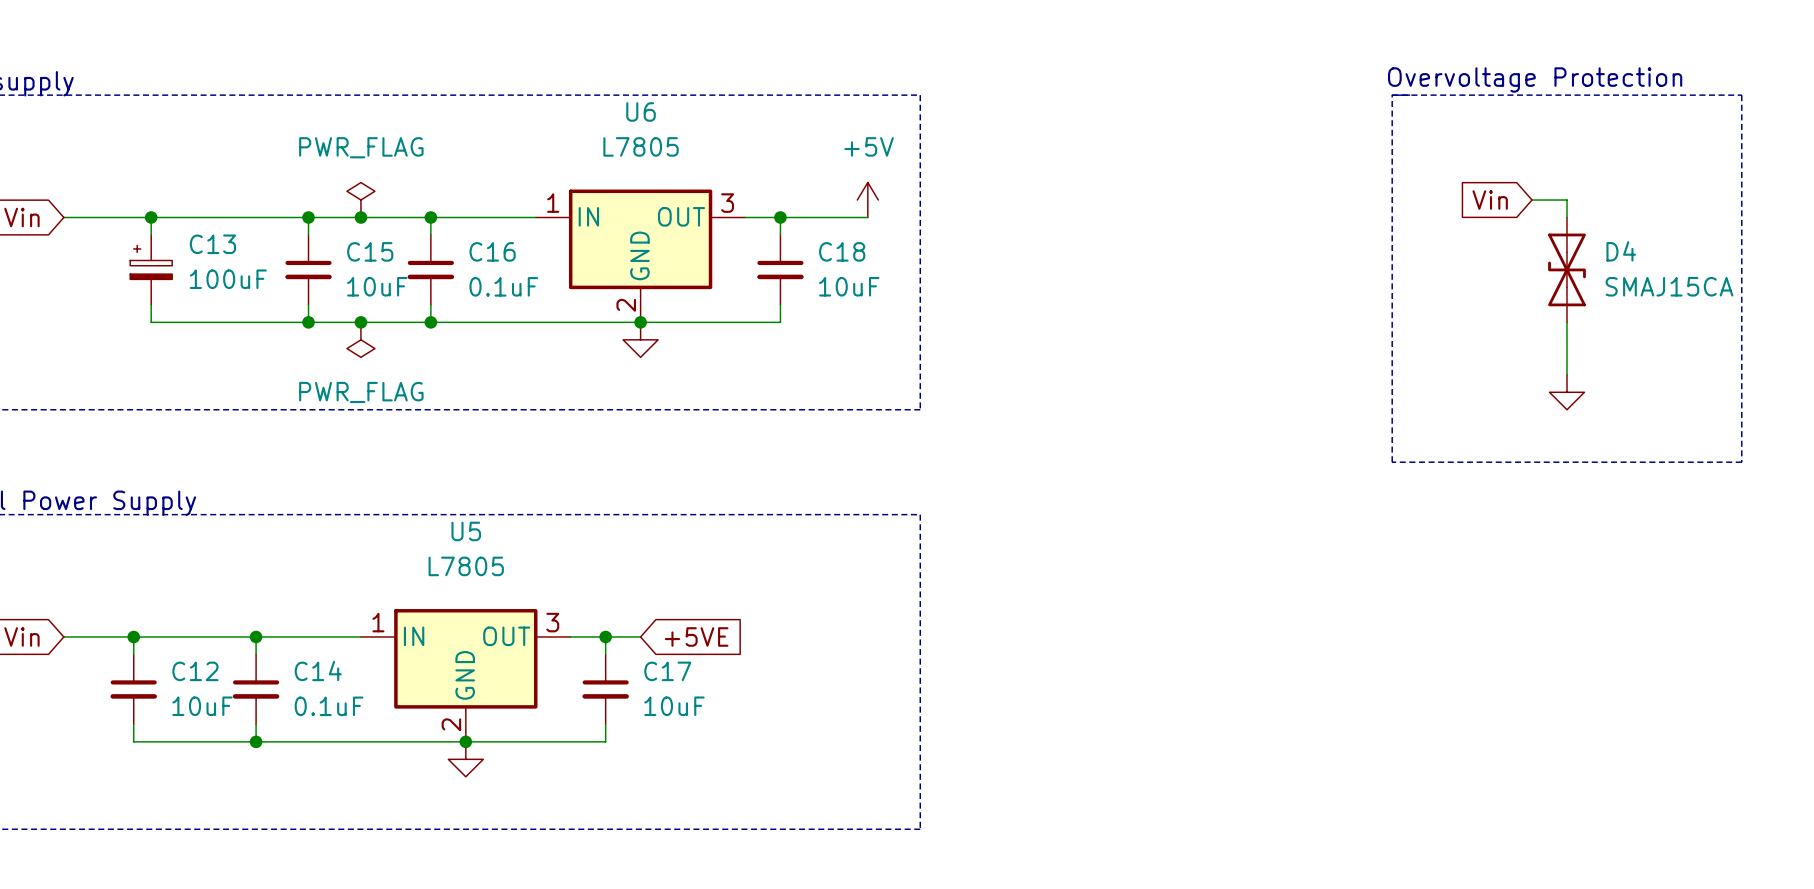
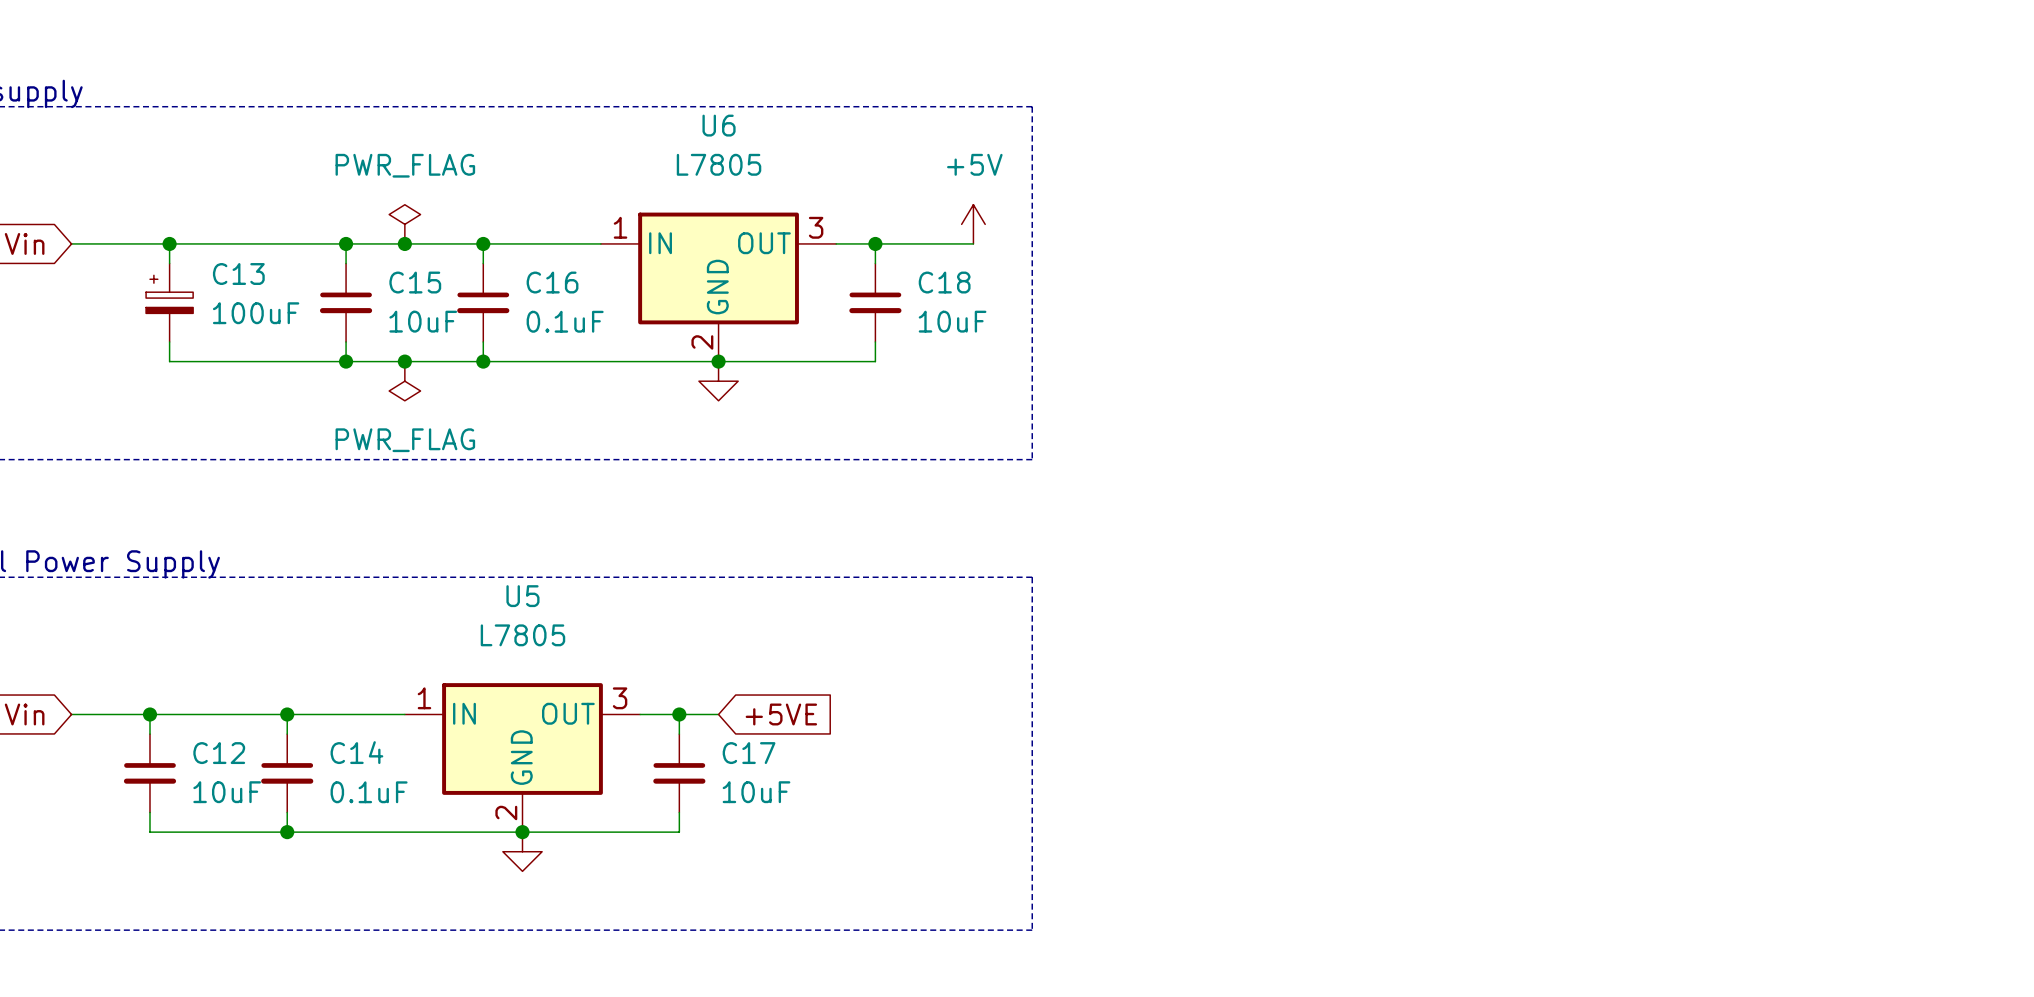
text: Overvoltage Protection (1535, 79) -> none
line: (1392, 95) (1741, 95) (1741, 462) (1392, 462) (1392, 95) -> none
line: (1392, 95) (1409, 95) -> none
global label: Vin (1490, 200) -> none
wire: (1532, 200) (1566, 200) (1566, 217) -> none
D4: SMAJ15CA (1566, 269) -> none
wire: (1566, 322) (1566, 374) -> none
power symbol: (1566, 392) -> none

